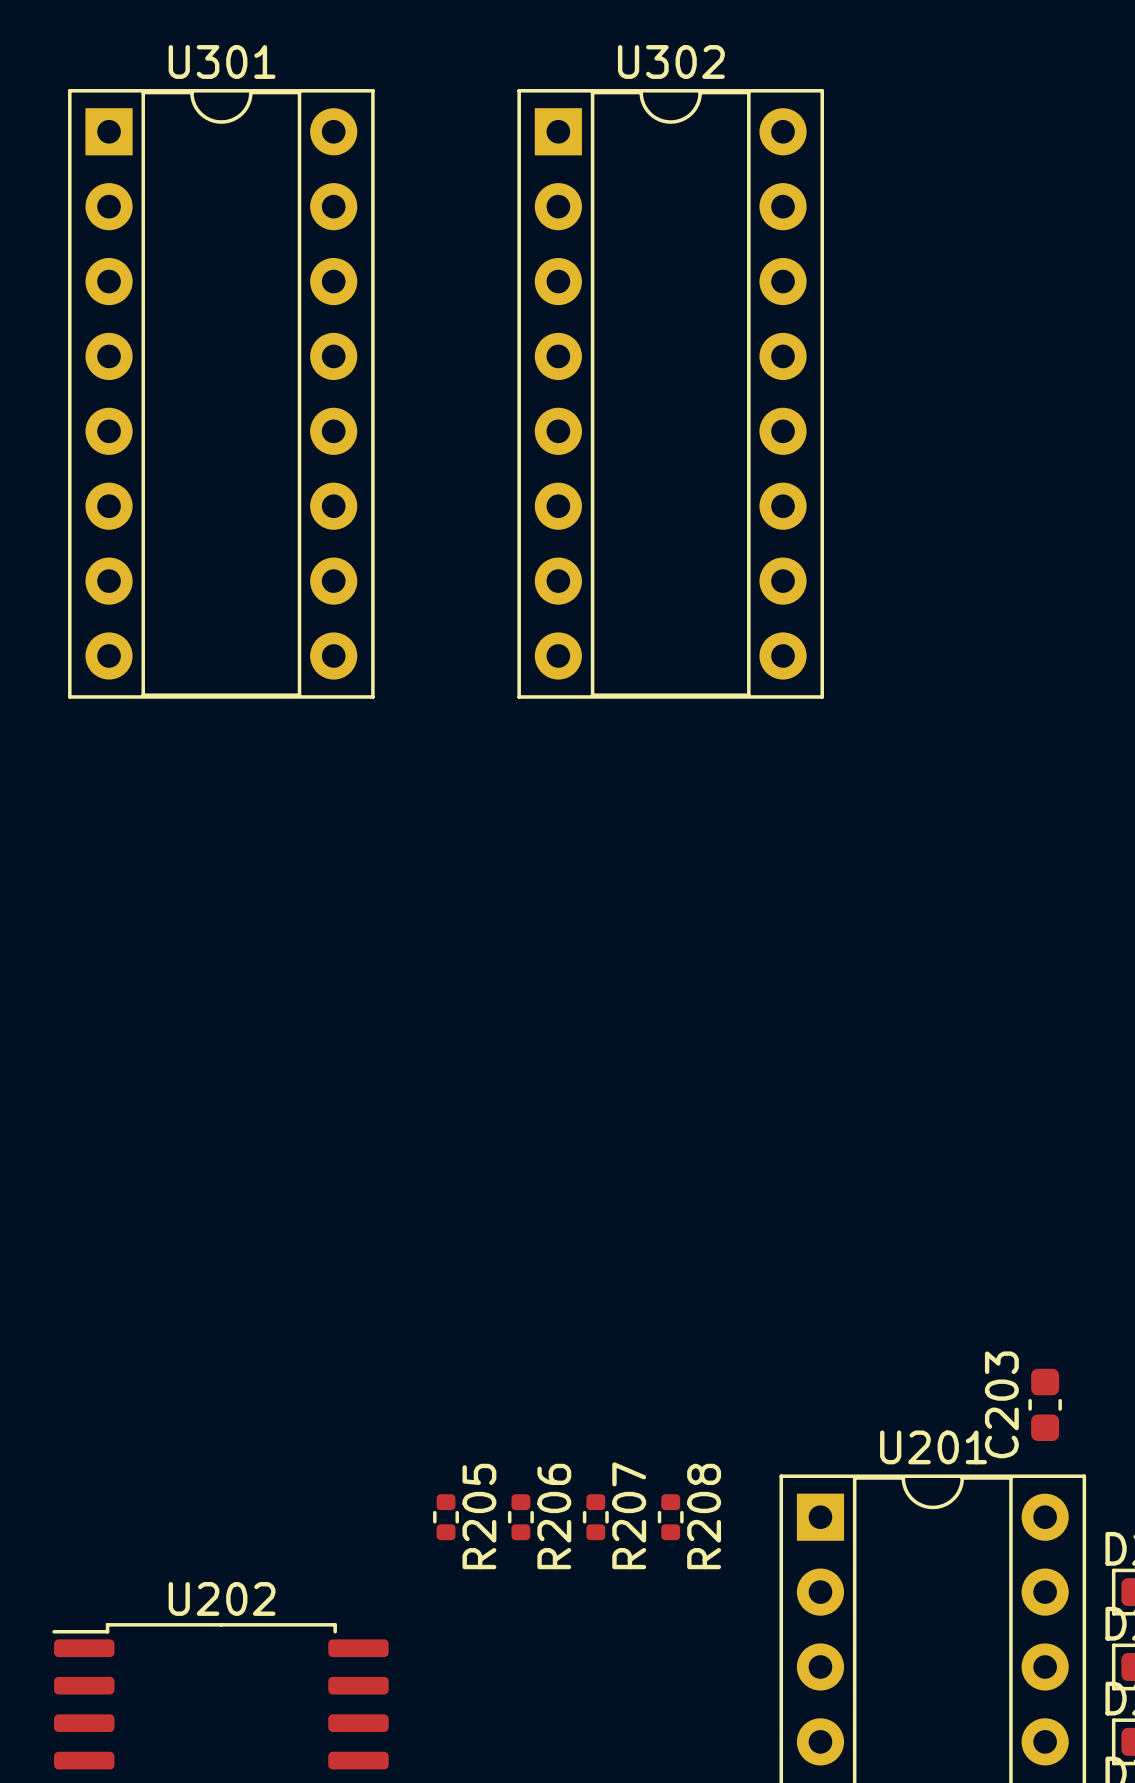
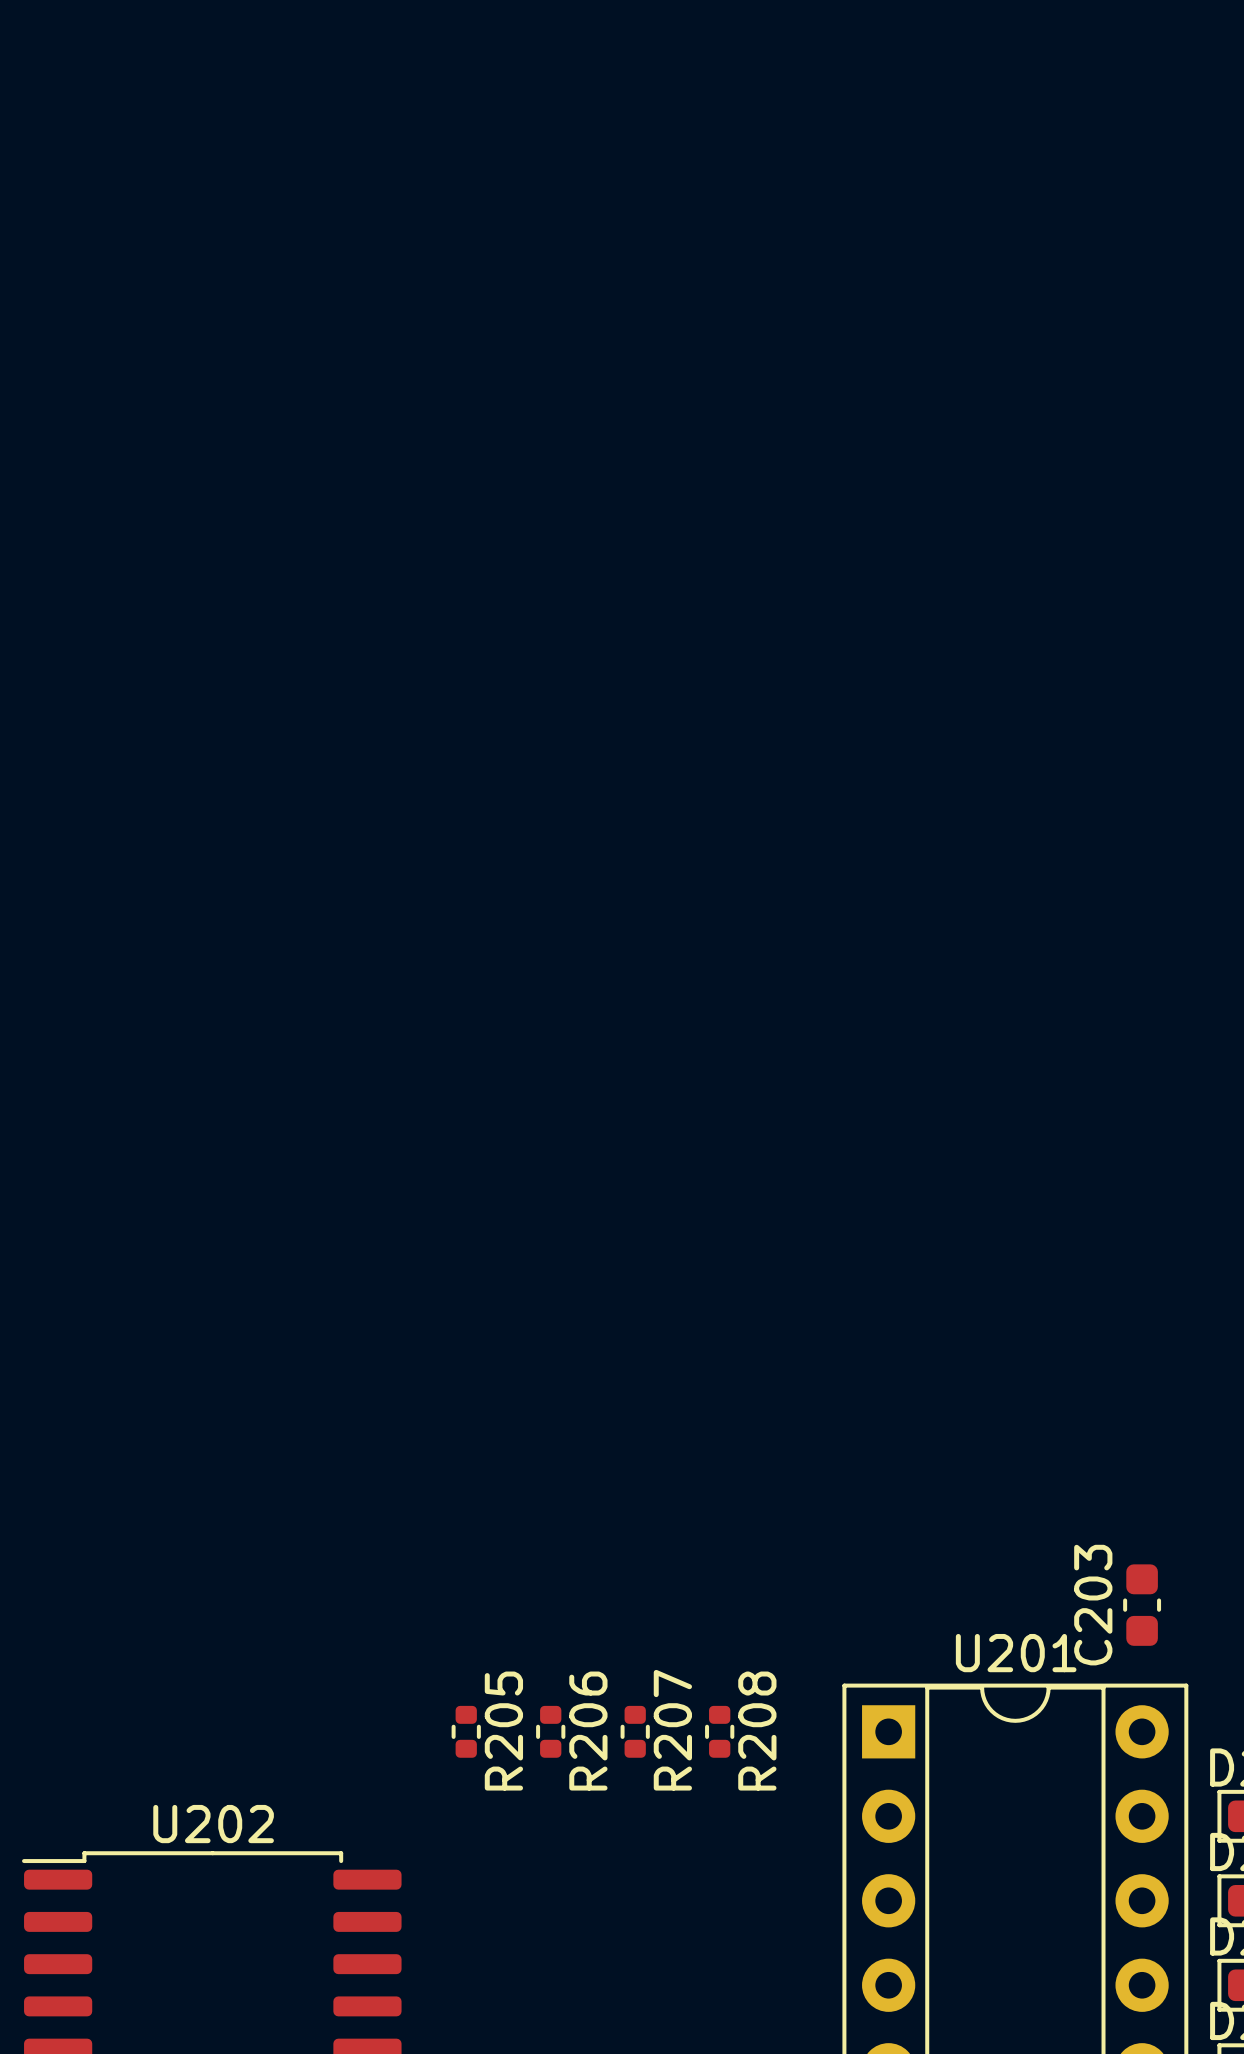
U301: (221, 393) -> none
U302: (670, 393) -> none

